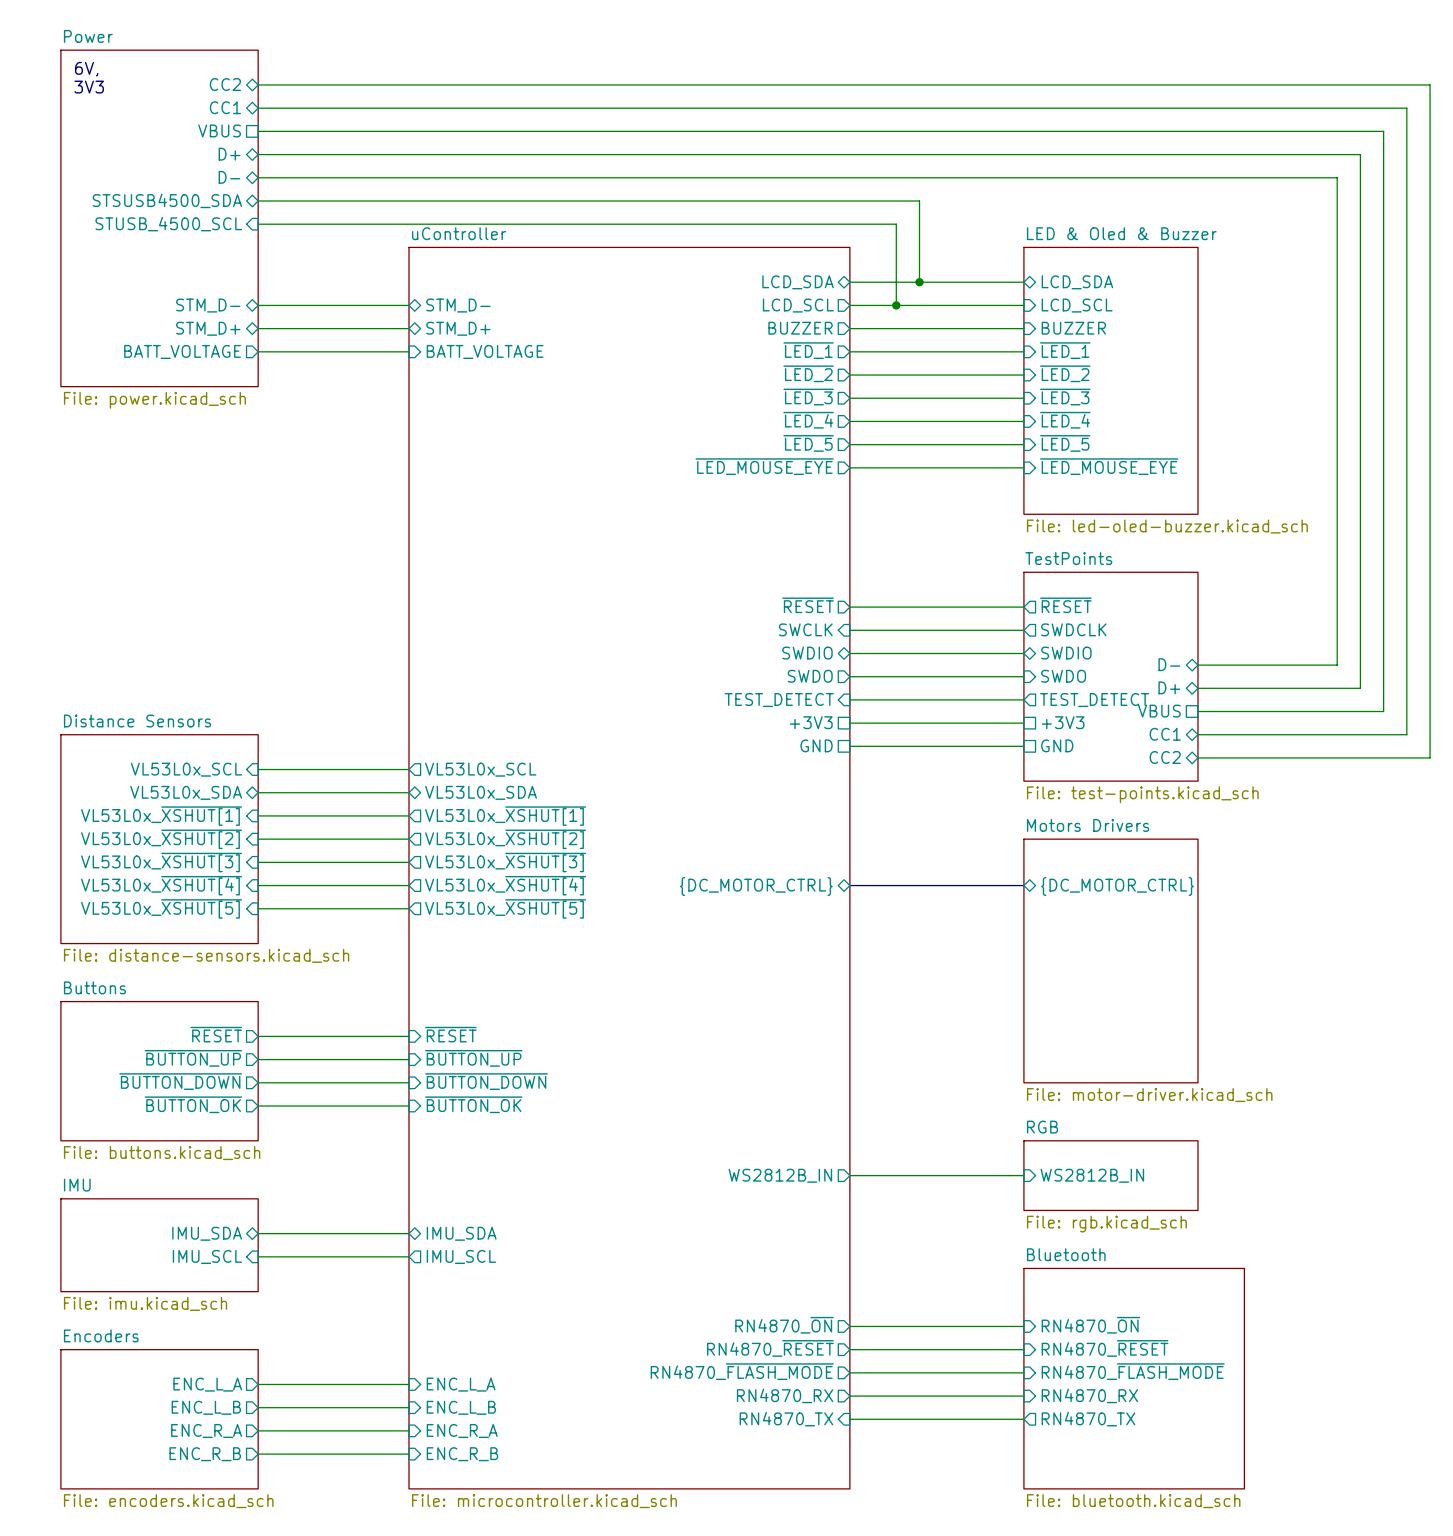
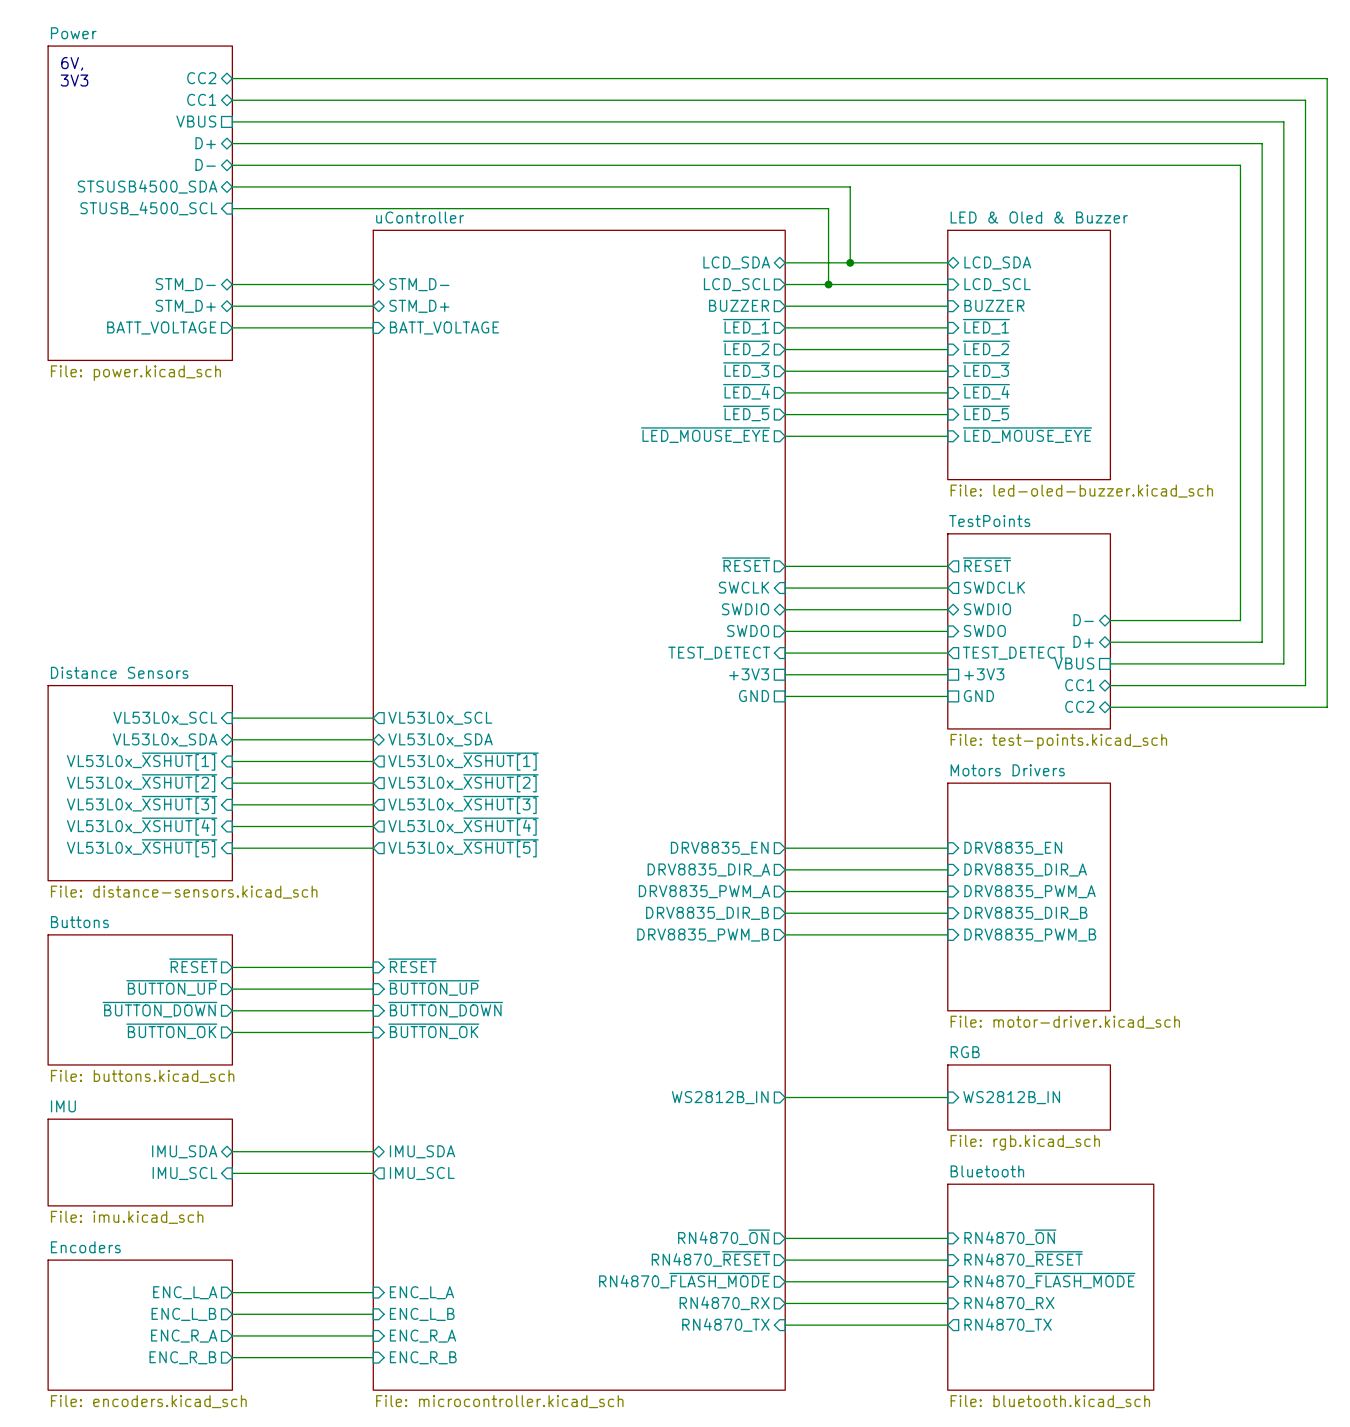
bus: (849, 885) (1023, 885) -> none
sheet pin: {DC_MOTOR_CTRL} (756, 886) -> none
sheet pin: {DC_MOTOR_CTRL} (1117, 886) -> none
sheet pin: none -> DRV8835_EN (719, 848)
wire: none -> (785, 848) (947, 848)
sheet pin: none -> DRV8835_EN (1013, 848)
wire: none -> (785, 869) (947, 869)
sheet pin: none -> DRV8835_DIR_A (708, 869)
sheet pin: none -> DRV8835_DIR_A (1025, 869)
sheet pin: none -> DRV8835_PWM_A (704, 891)
wire: none -> (785, 891) (947, 891)
sheet pin: none -> DRV8835_PWM_A (1030, 891)
sheet pin: none -> DRV8835_DIR_B (707, 913)
wire: none -> (785, 913) (947, 913)
sheet pin: none -> DRV8835_DIR_B (1025, 913)
sheet pin: none -> DRV8835_PWM_B (703, 935)
wire: none -> (785, 934) (947, 934)
sheet pin: none -> DRV8835_PWM_B (1030, 935)

